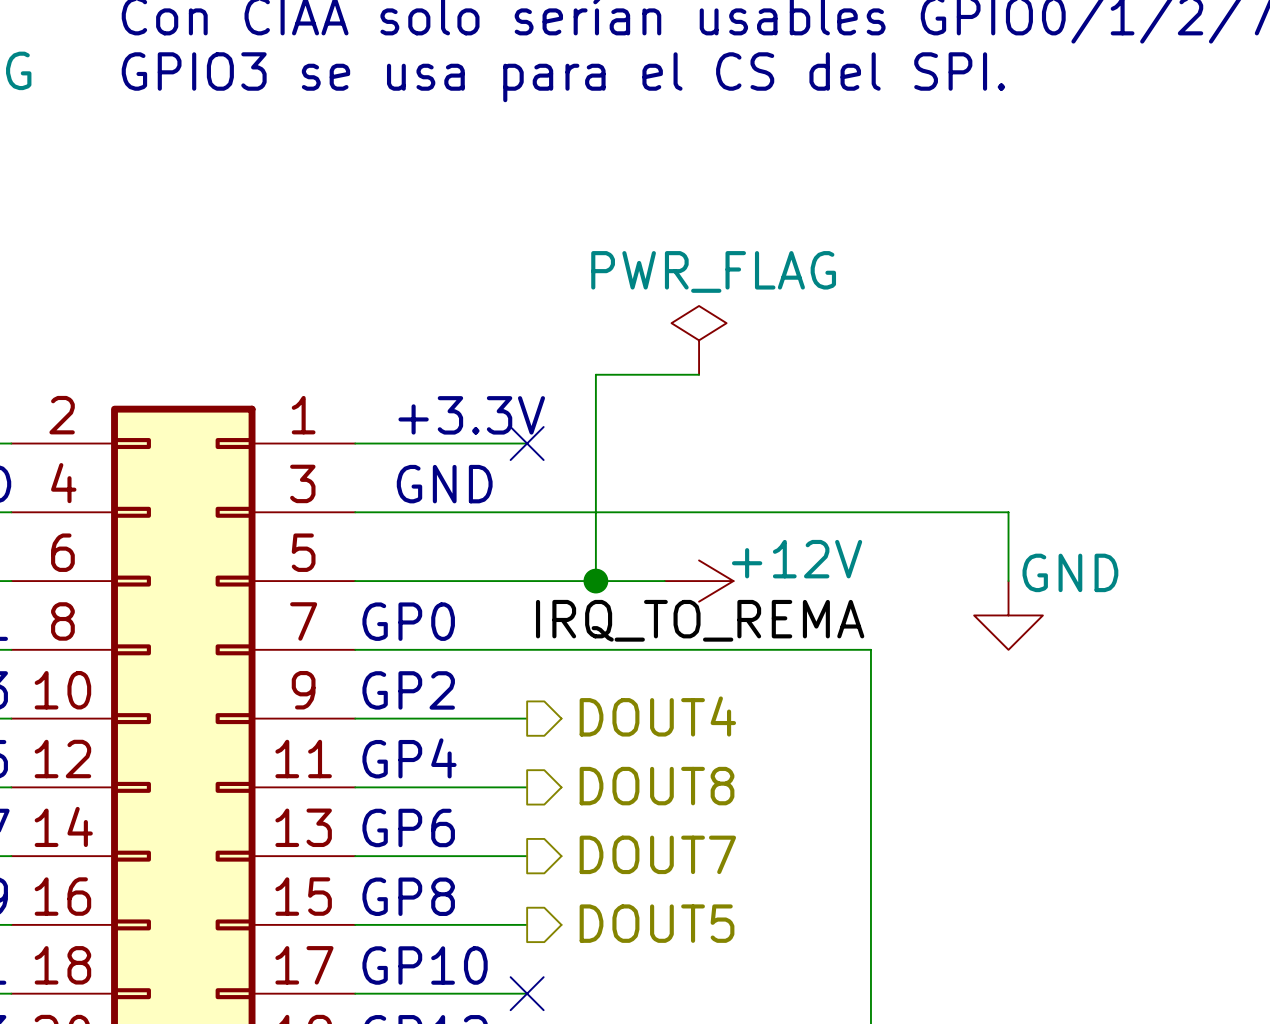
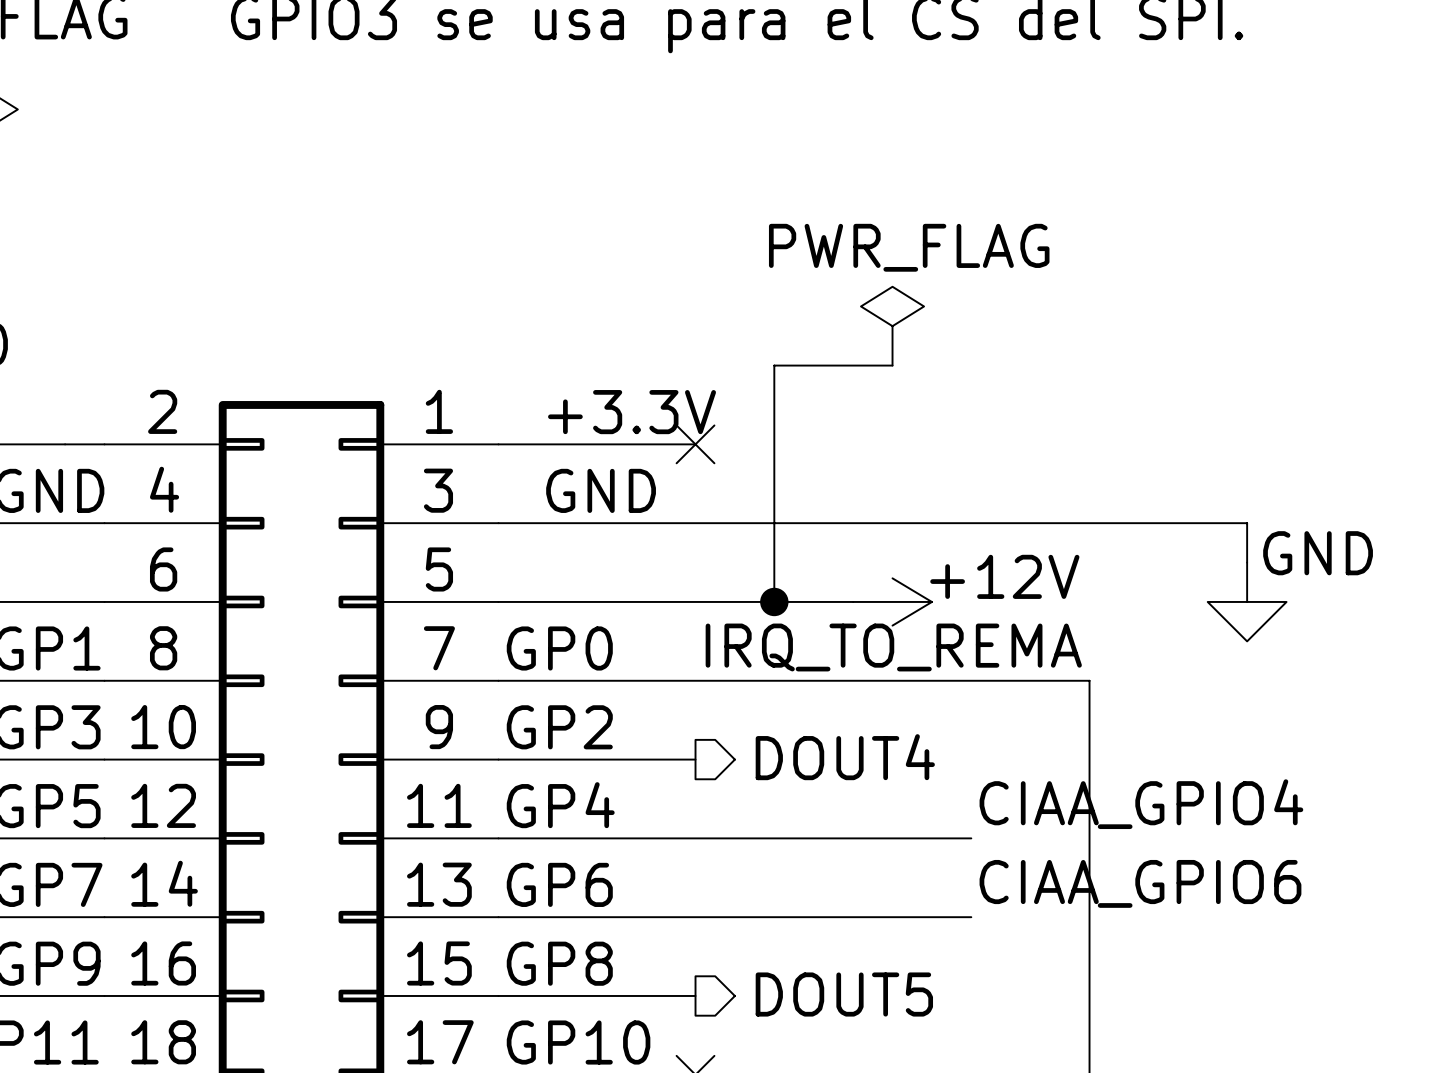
power symbol position: GND (1008, 615) -> GND (1247, 601)
label: none -> CIAA_GPIO4 (1141, 804)
hierarchical label: DOUT8 (657, 786) -> none
wire: none -> (695, 838) (971, 838)
label: none -> CIAA_GPIO6 (1140, 883)
hierarchical label: DOUT7 (657, 854) -> none
wire: none -> (695, 917) (971, 917)

